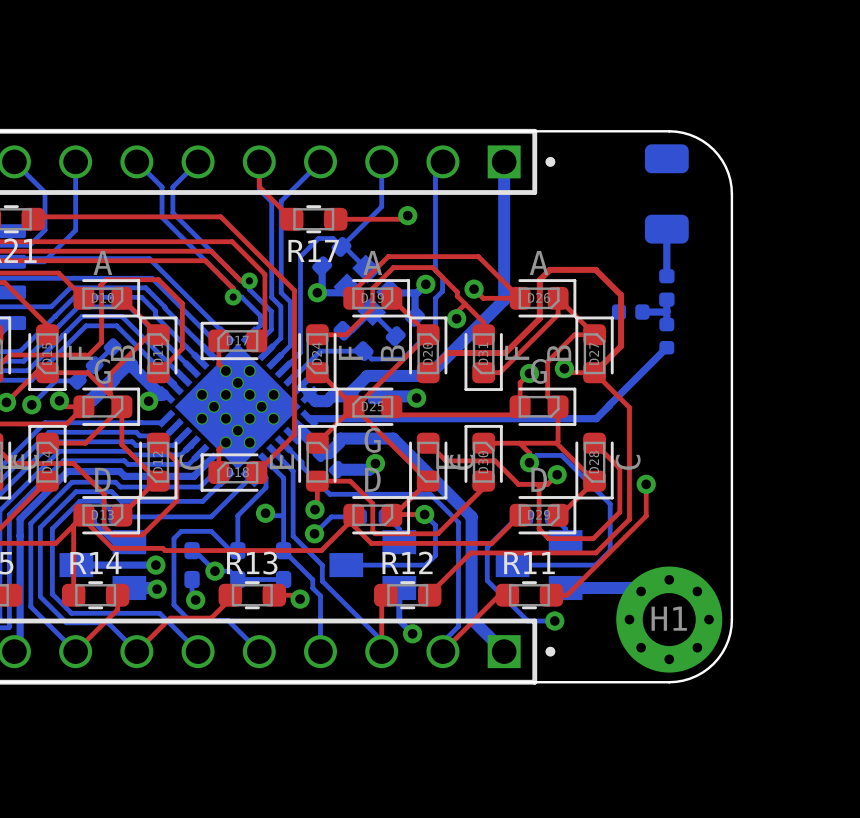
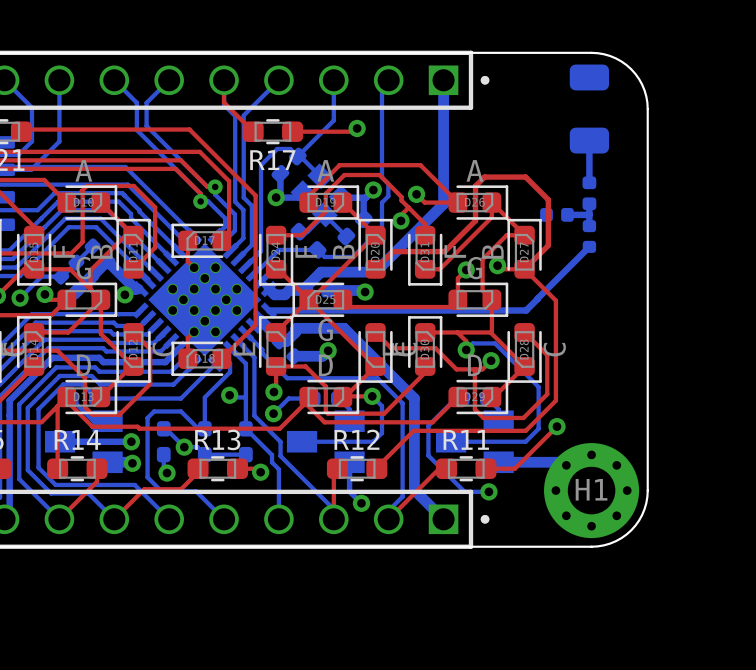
top track: (646, 484) (646, 516) (567, 595) -> (556, 426) (514, 468) (499, 468)
via position: (646, 484) -> (556, 426)

